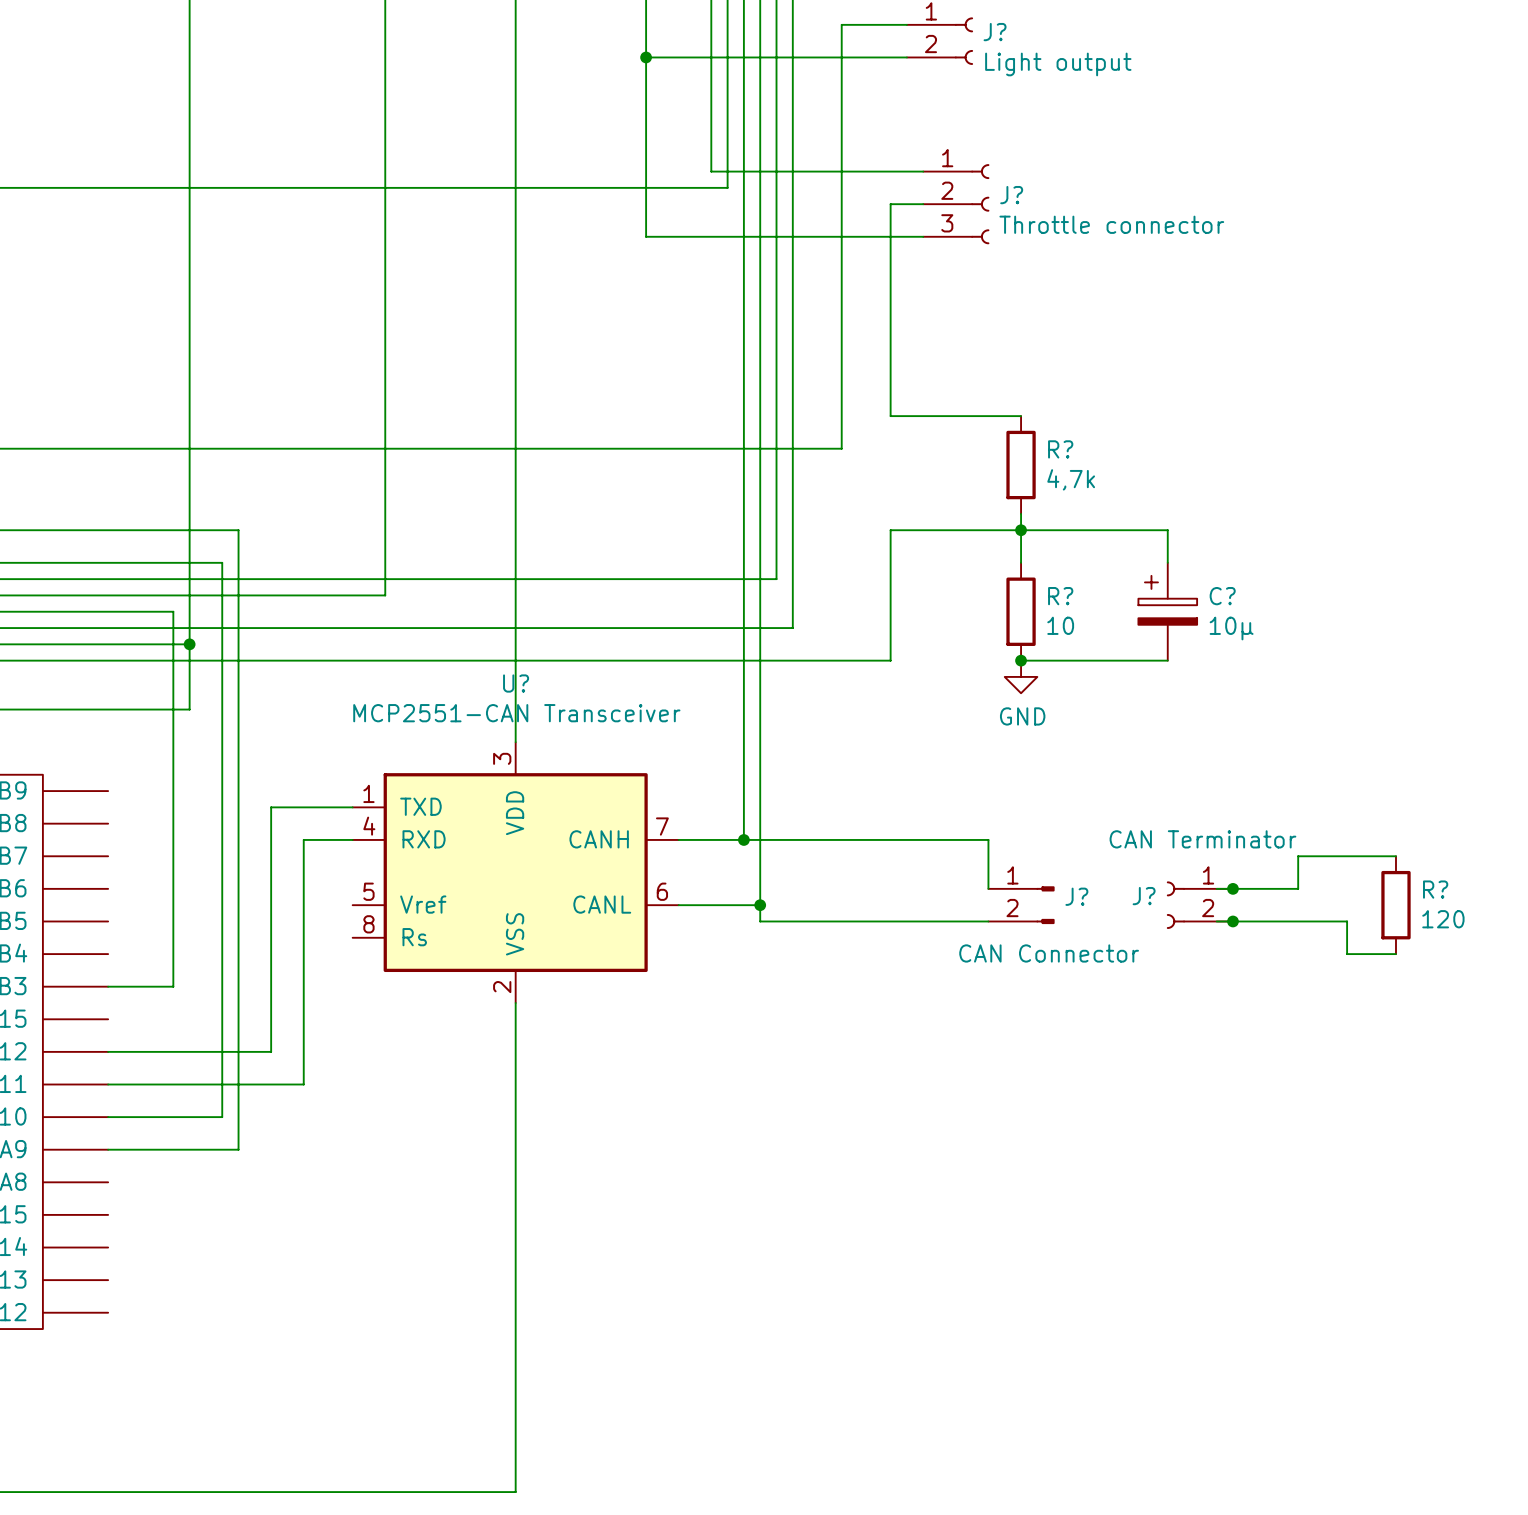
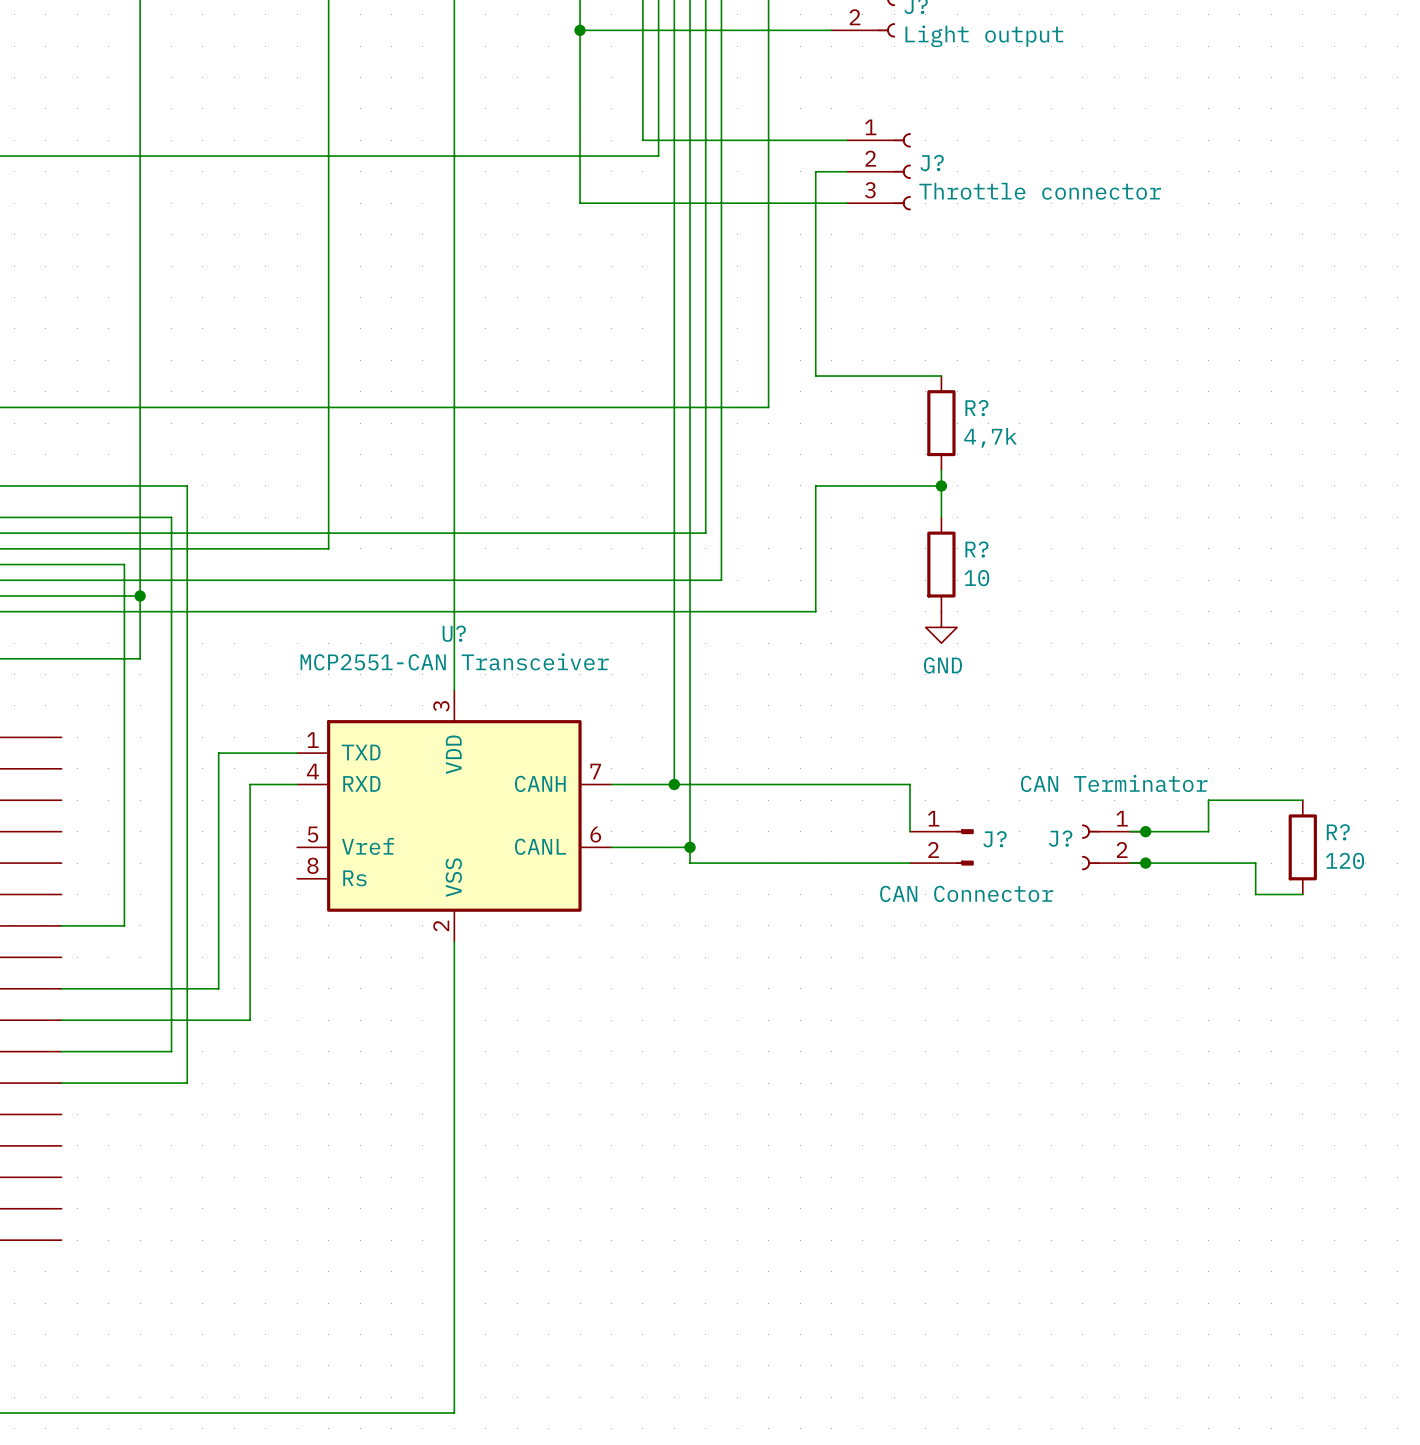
wire: (1021, 530) (1167, 530) (1167, 562) -> none
C?: 10µ (1167, 611) -> none
wire: (1021, 660) (1167, 660) -> none
junction: (1021, 660) -> none

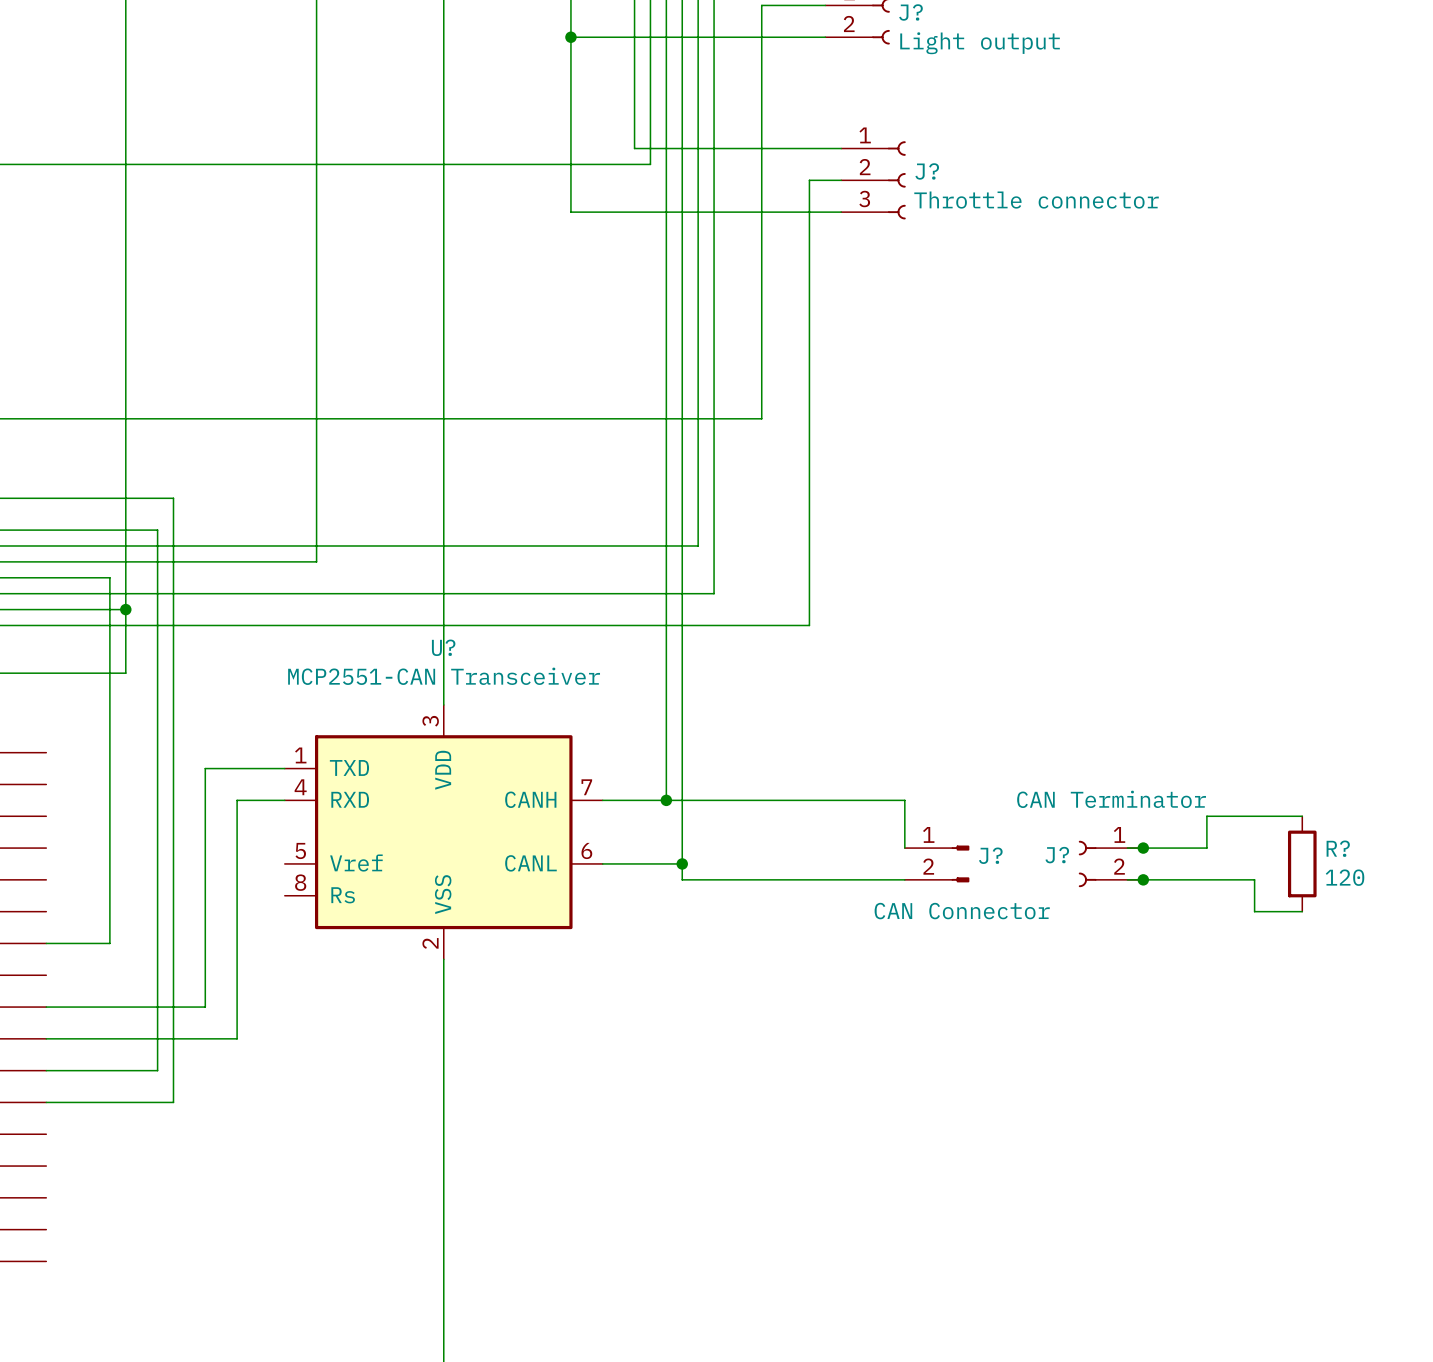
wire: (815, 376) (941, 376) -> (809, 387) (809, 498)
R?: 4,7k (941, 423) -> none
wire: (941, 470) (941, 517) -> none
wire: (815, 485) (941, 485) -> none
junction: (941, 485) -> none
R?: 10 (941, 564) -> none
power symbol: GND (941, 627) -> none

